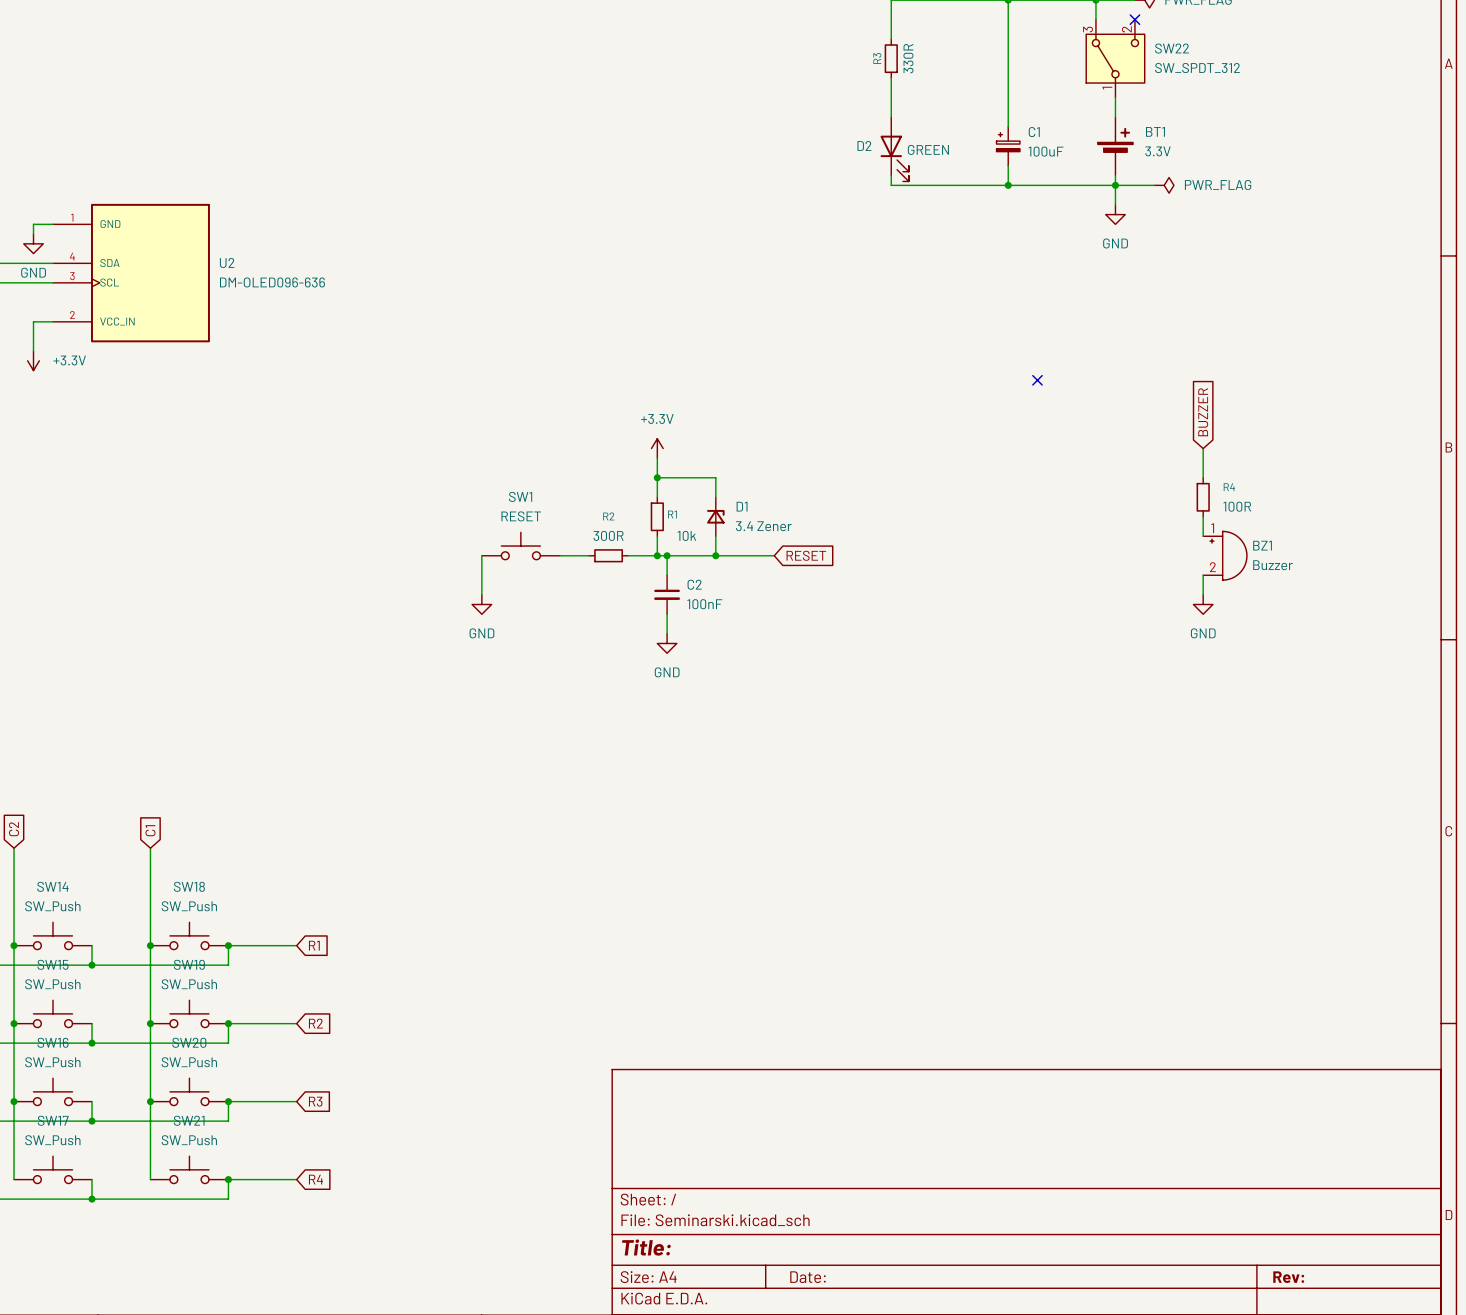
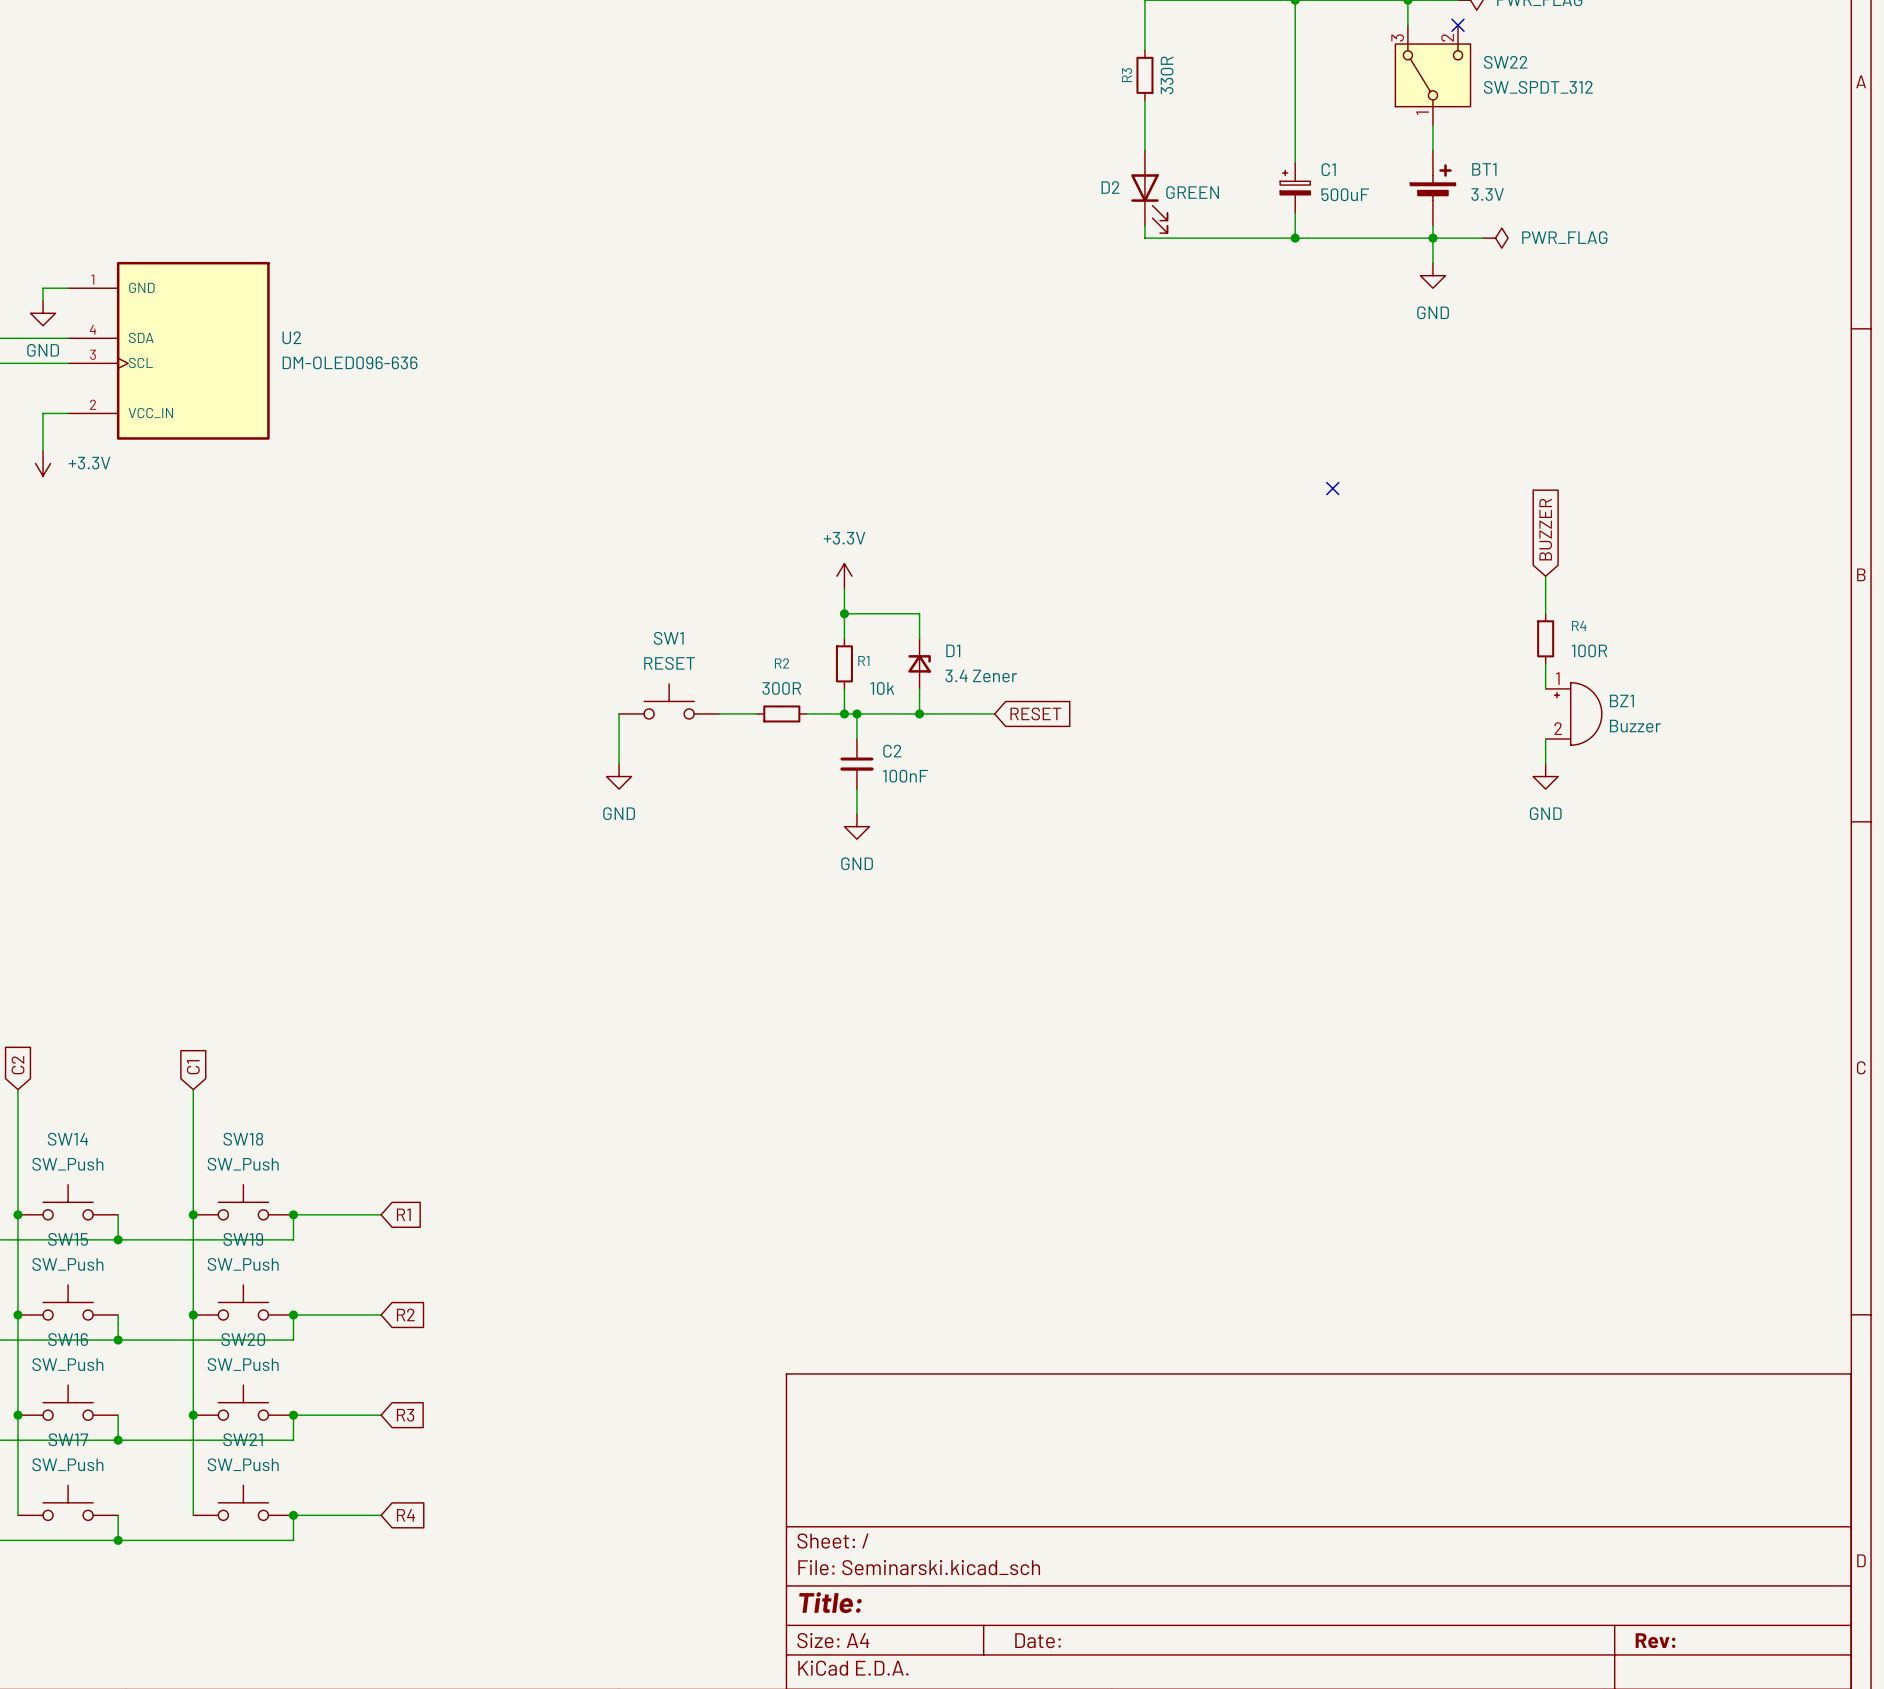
C1 value: 100uF (1045, 151) -> 500uF (1345, 194)

